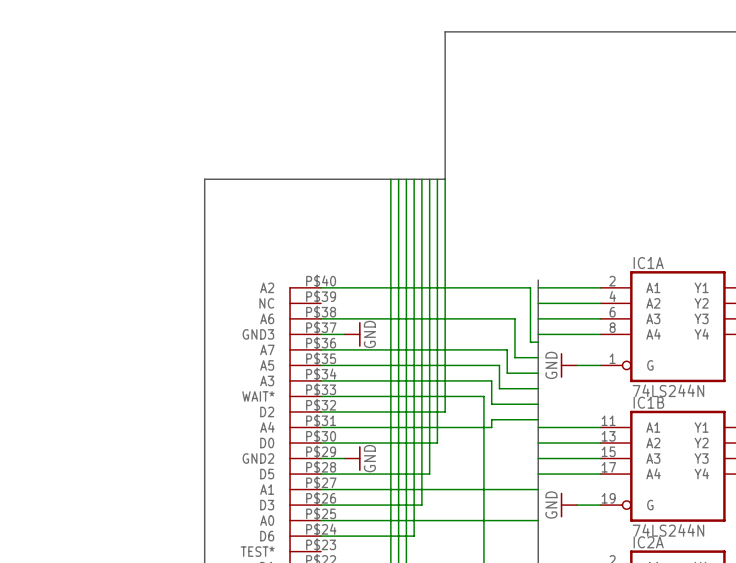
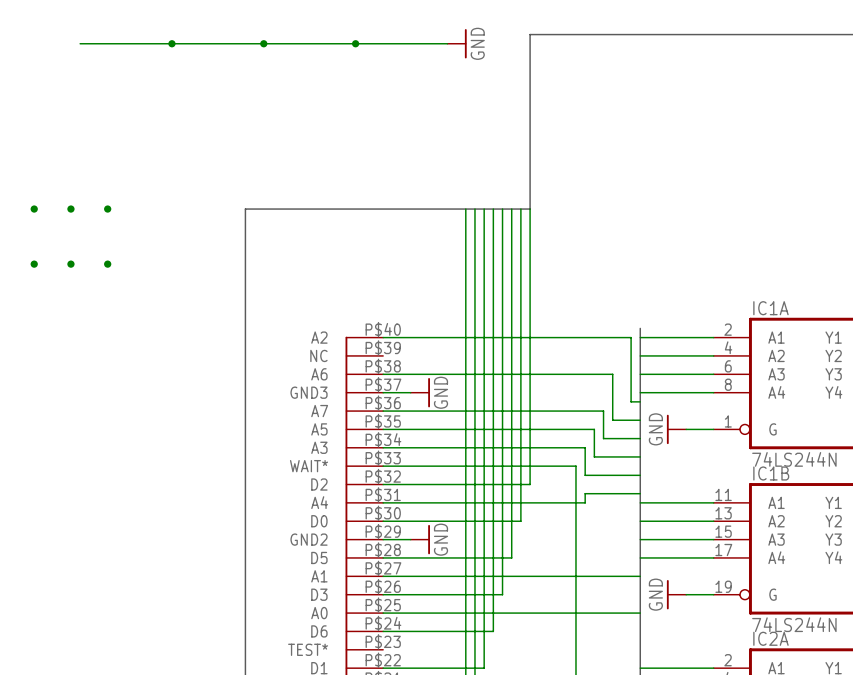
wire: none -> (80, 43) (447, 43)
junction: none -> (171, 43)
junction: none -> (263, 43)
junction: none -> (355, 43)
power symbol: none -> GND (457, 43)
junction: none -> (34, 209)
junction: none -> (70, 209)
junction: none -> (107, 209)
junction: none -> (34, 264)
junction: none -> (70, 264)
junction: none -> (107, 264)

